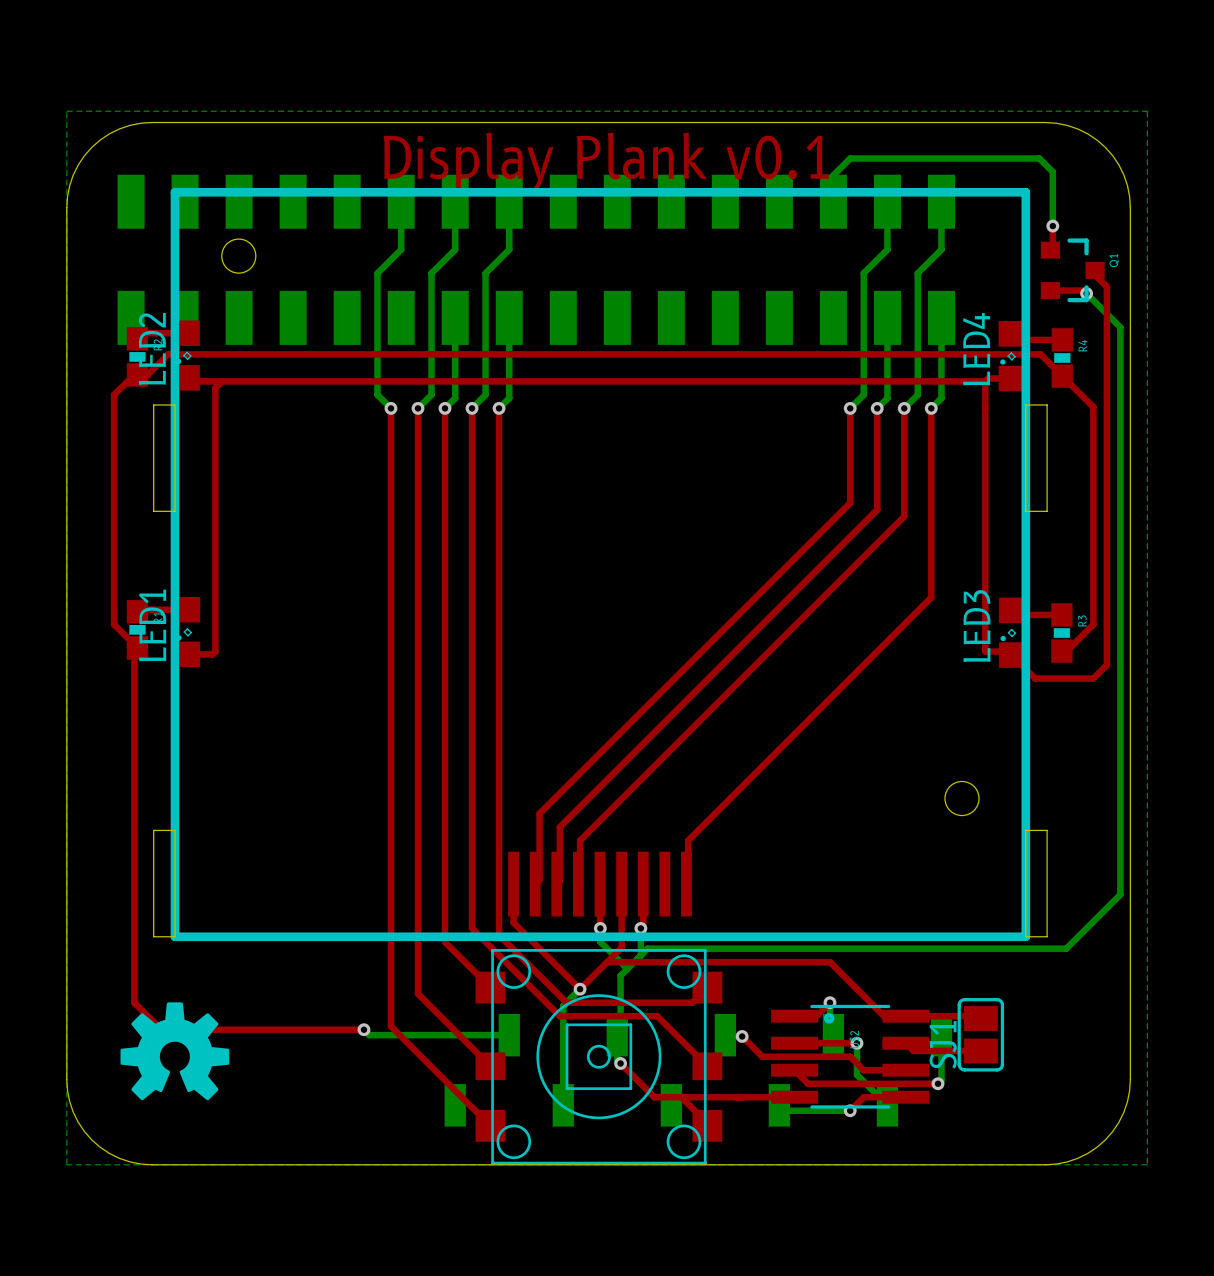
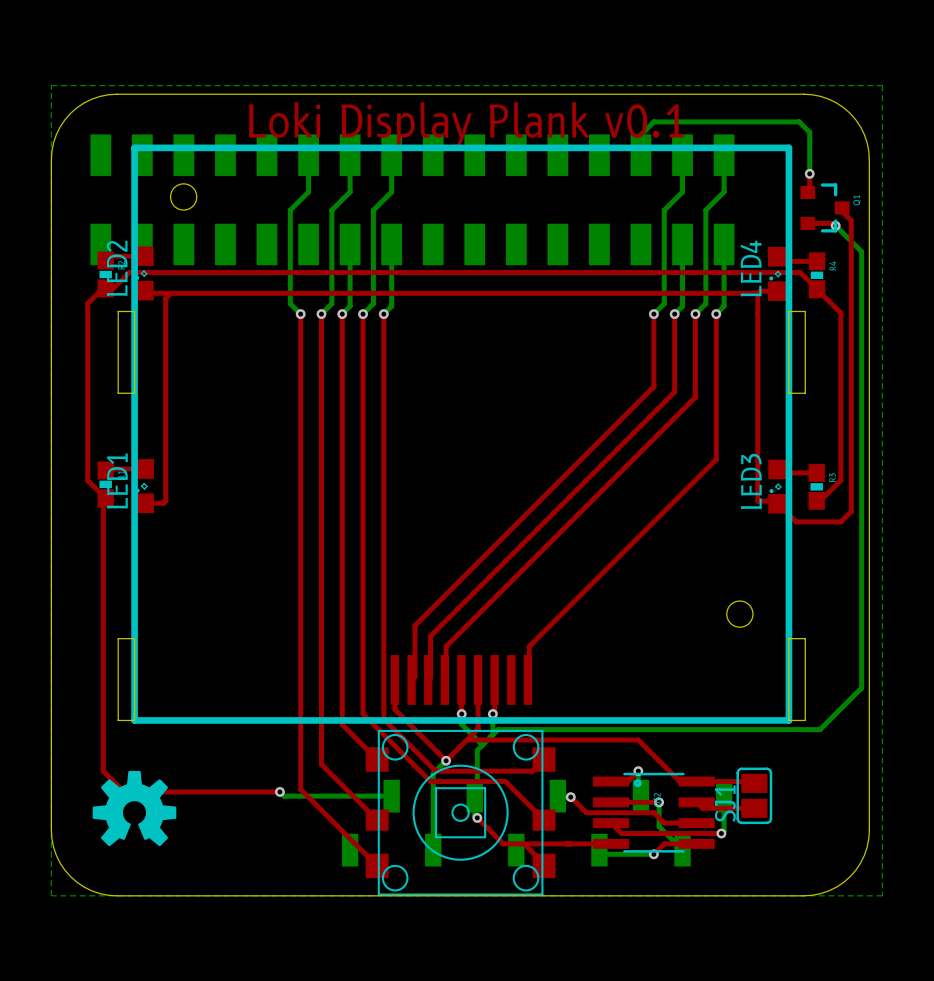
text: Display Plank v0.1 (606, 162) -> Loki Display Plank v0.1 (466, 125)

